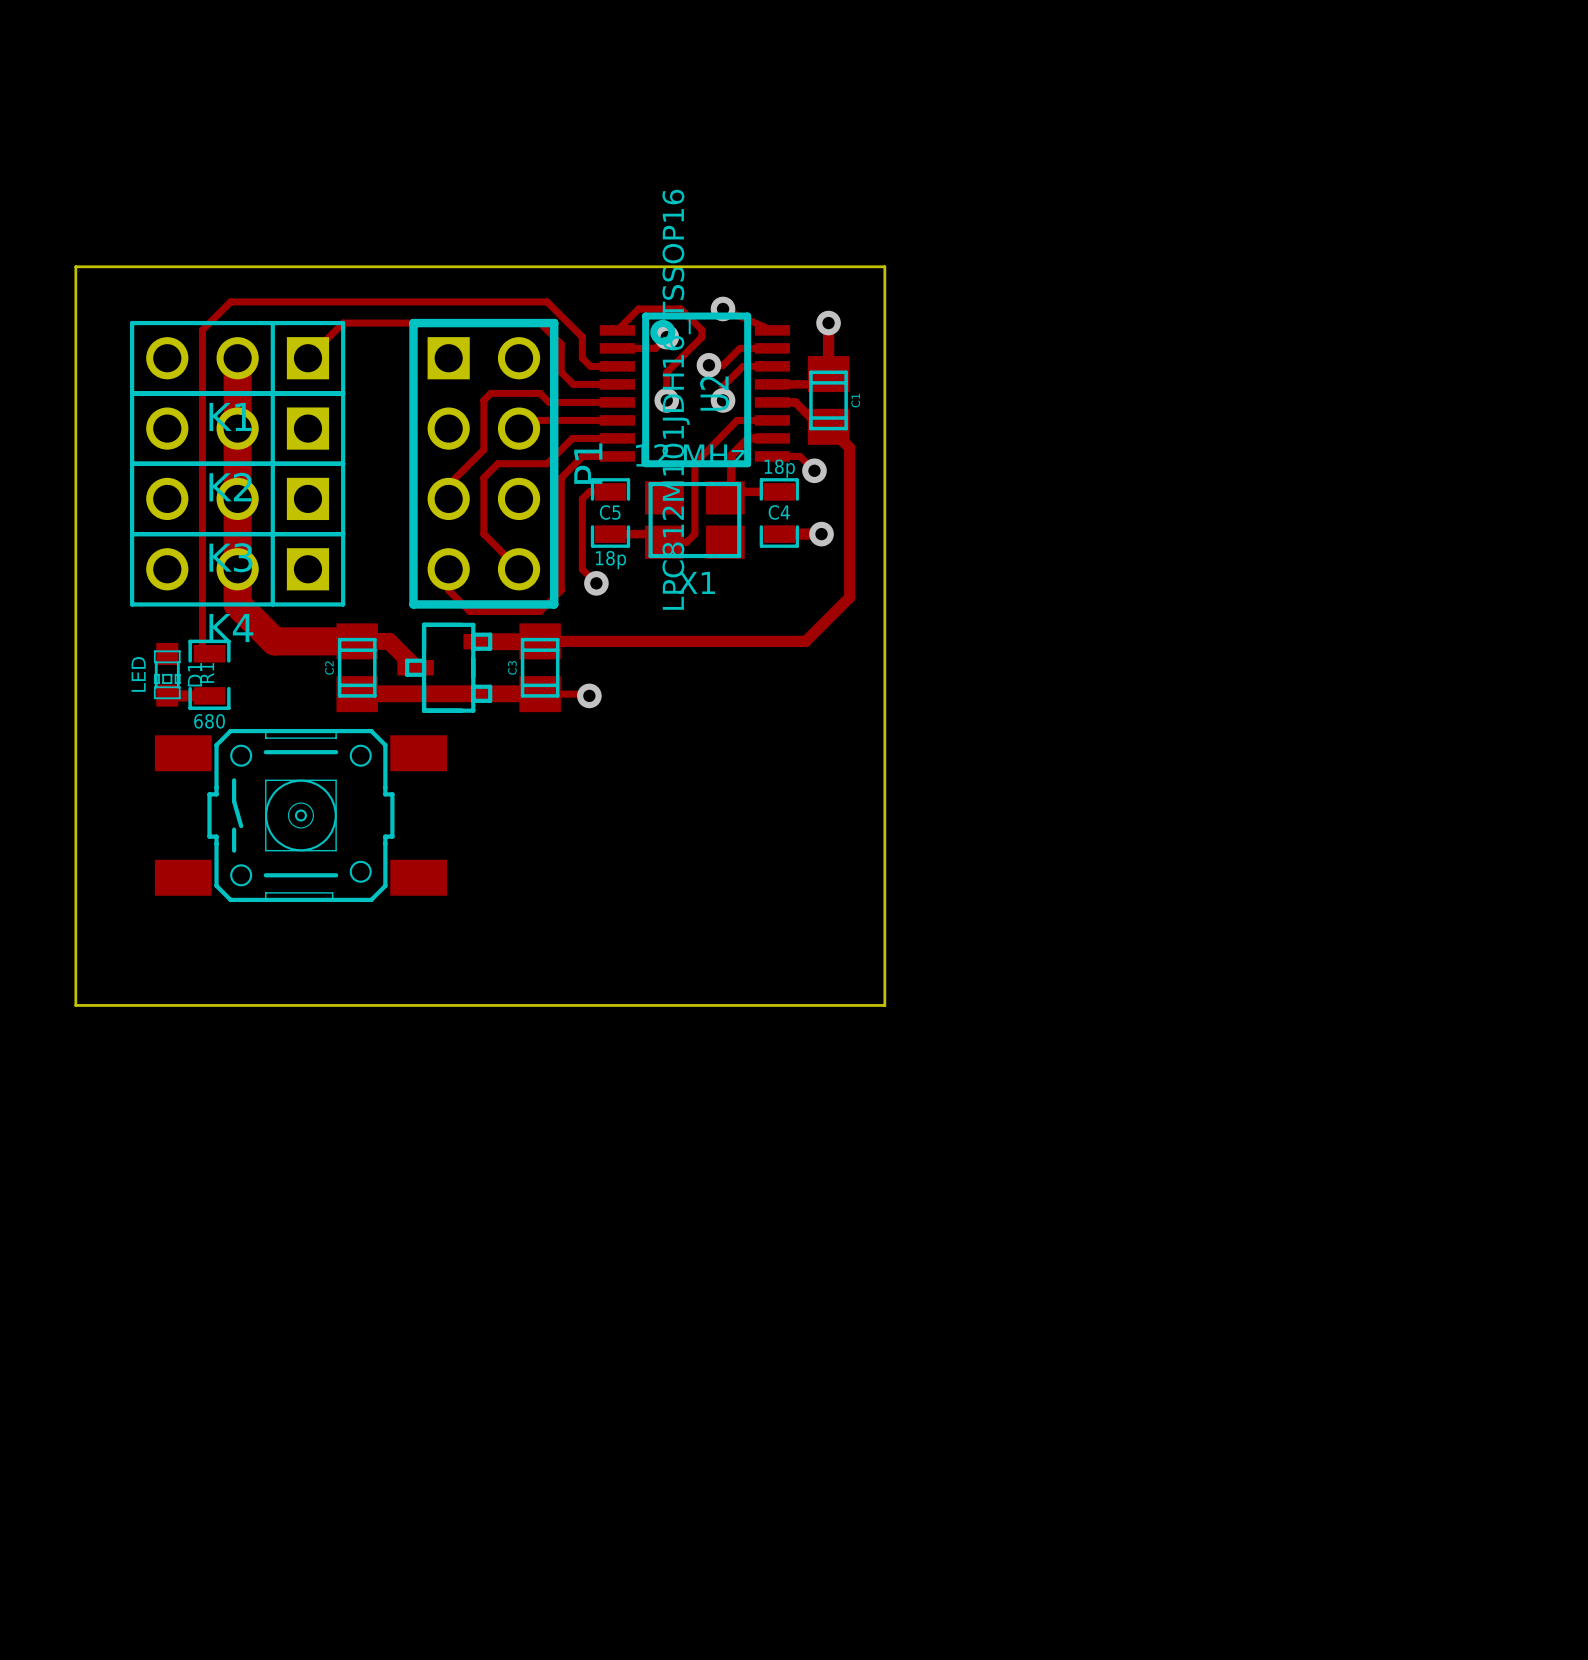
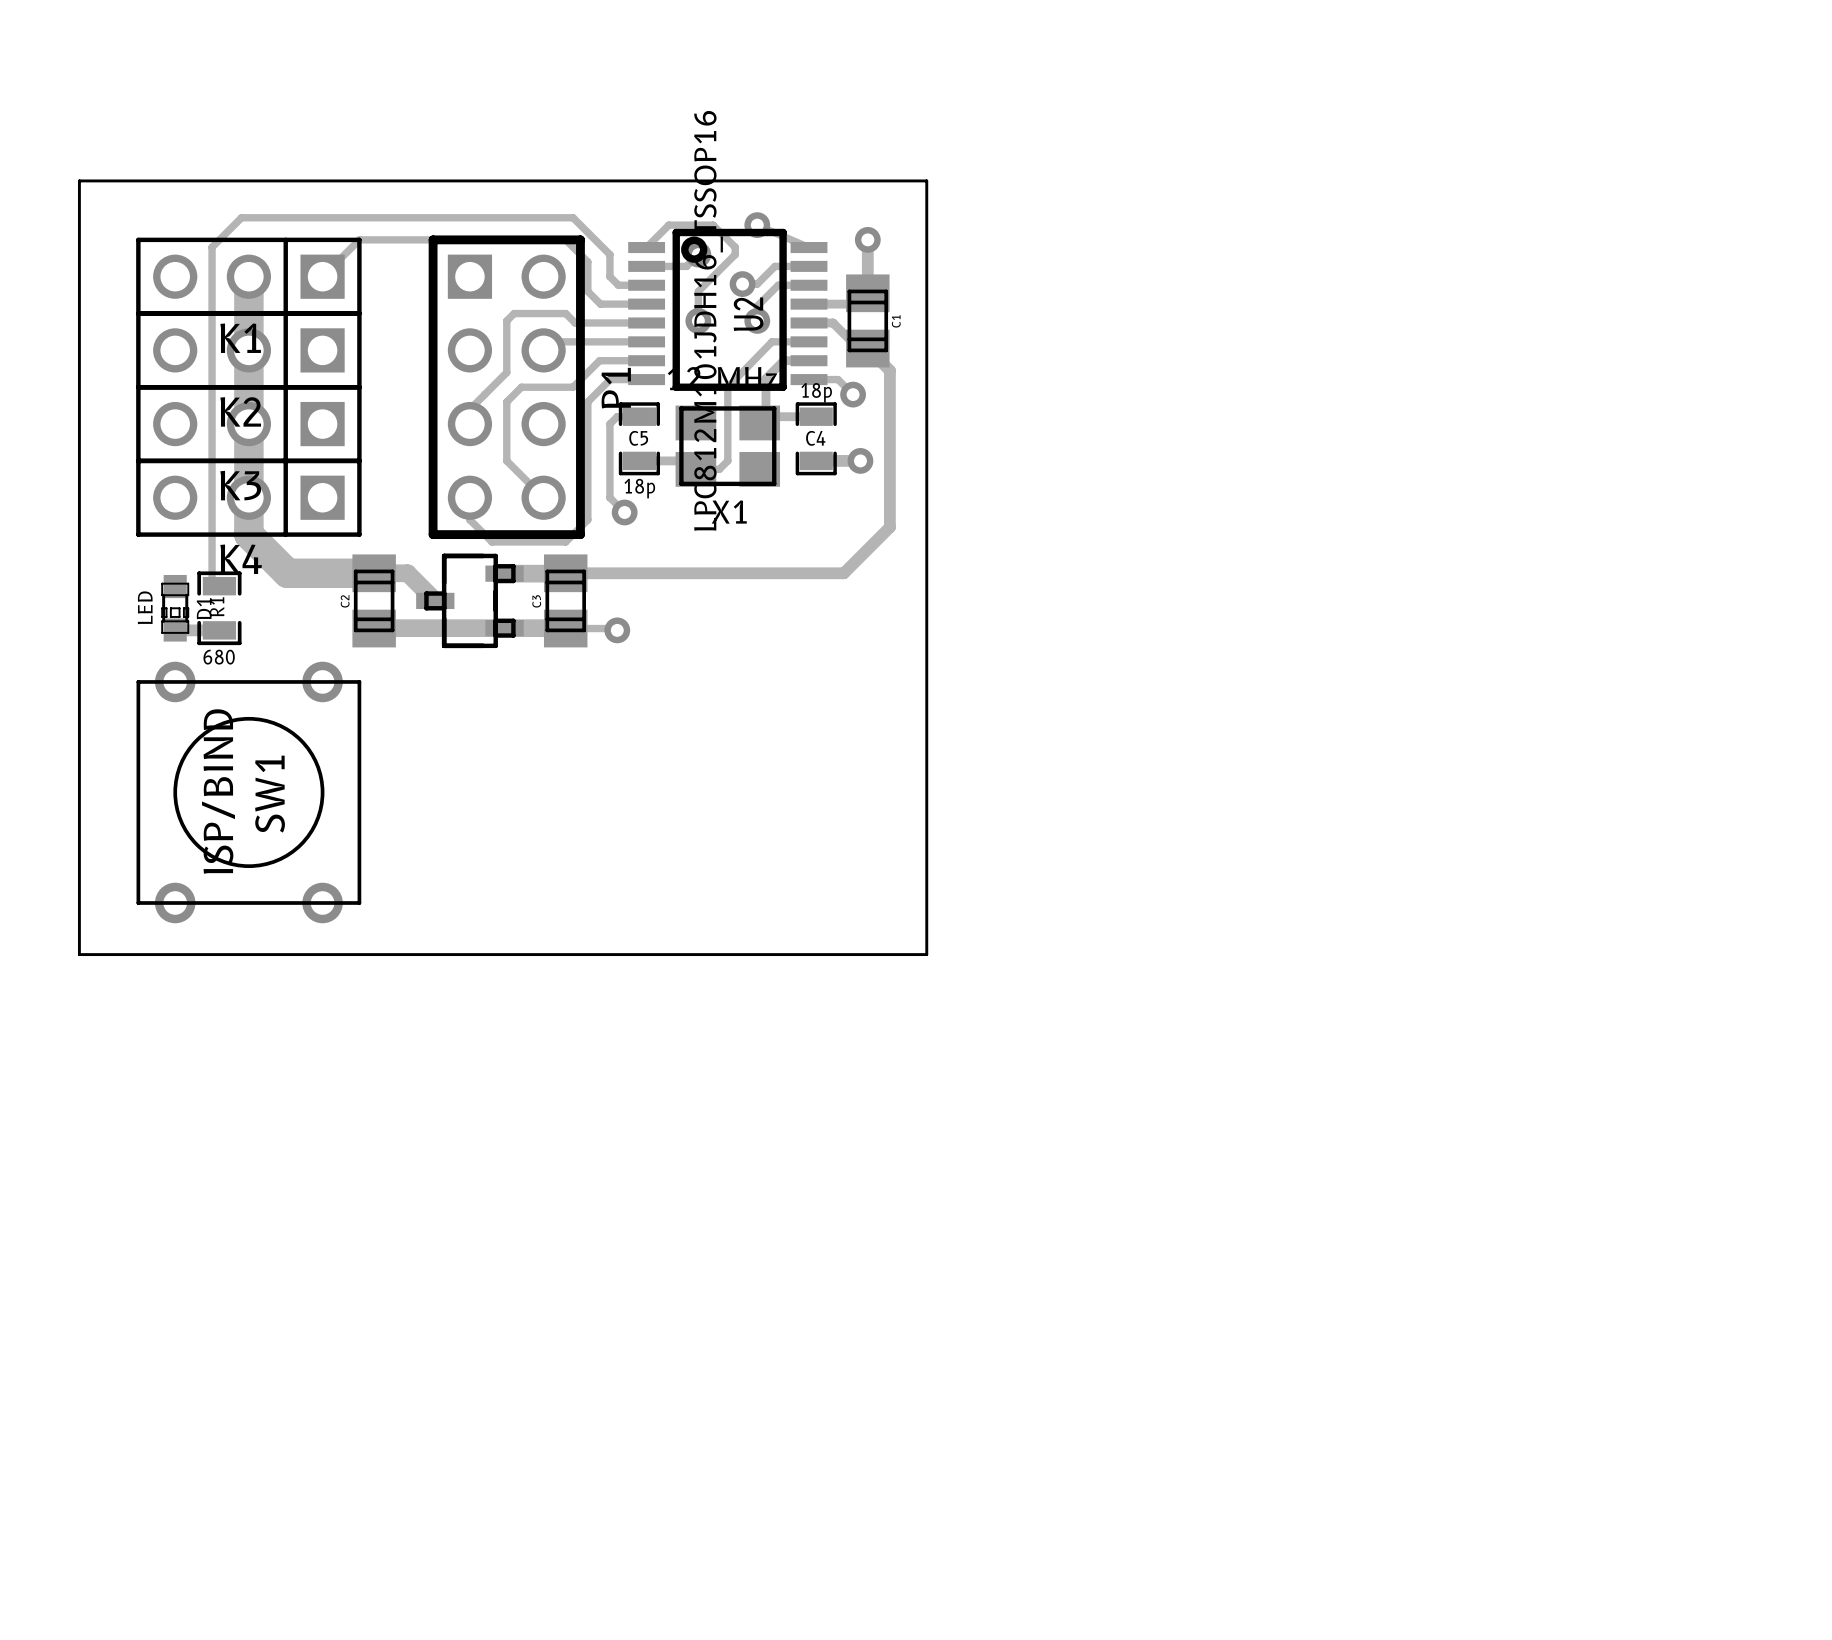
part: (300, 815) -> none
SW1: none -> ISP/BIND (248, 792)

